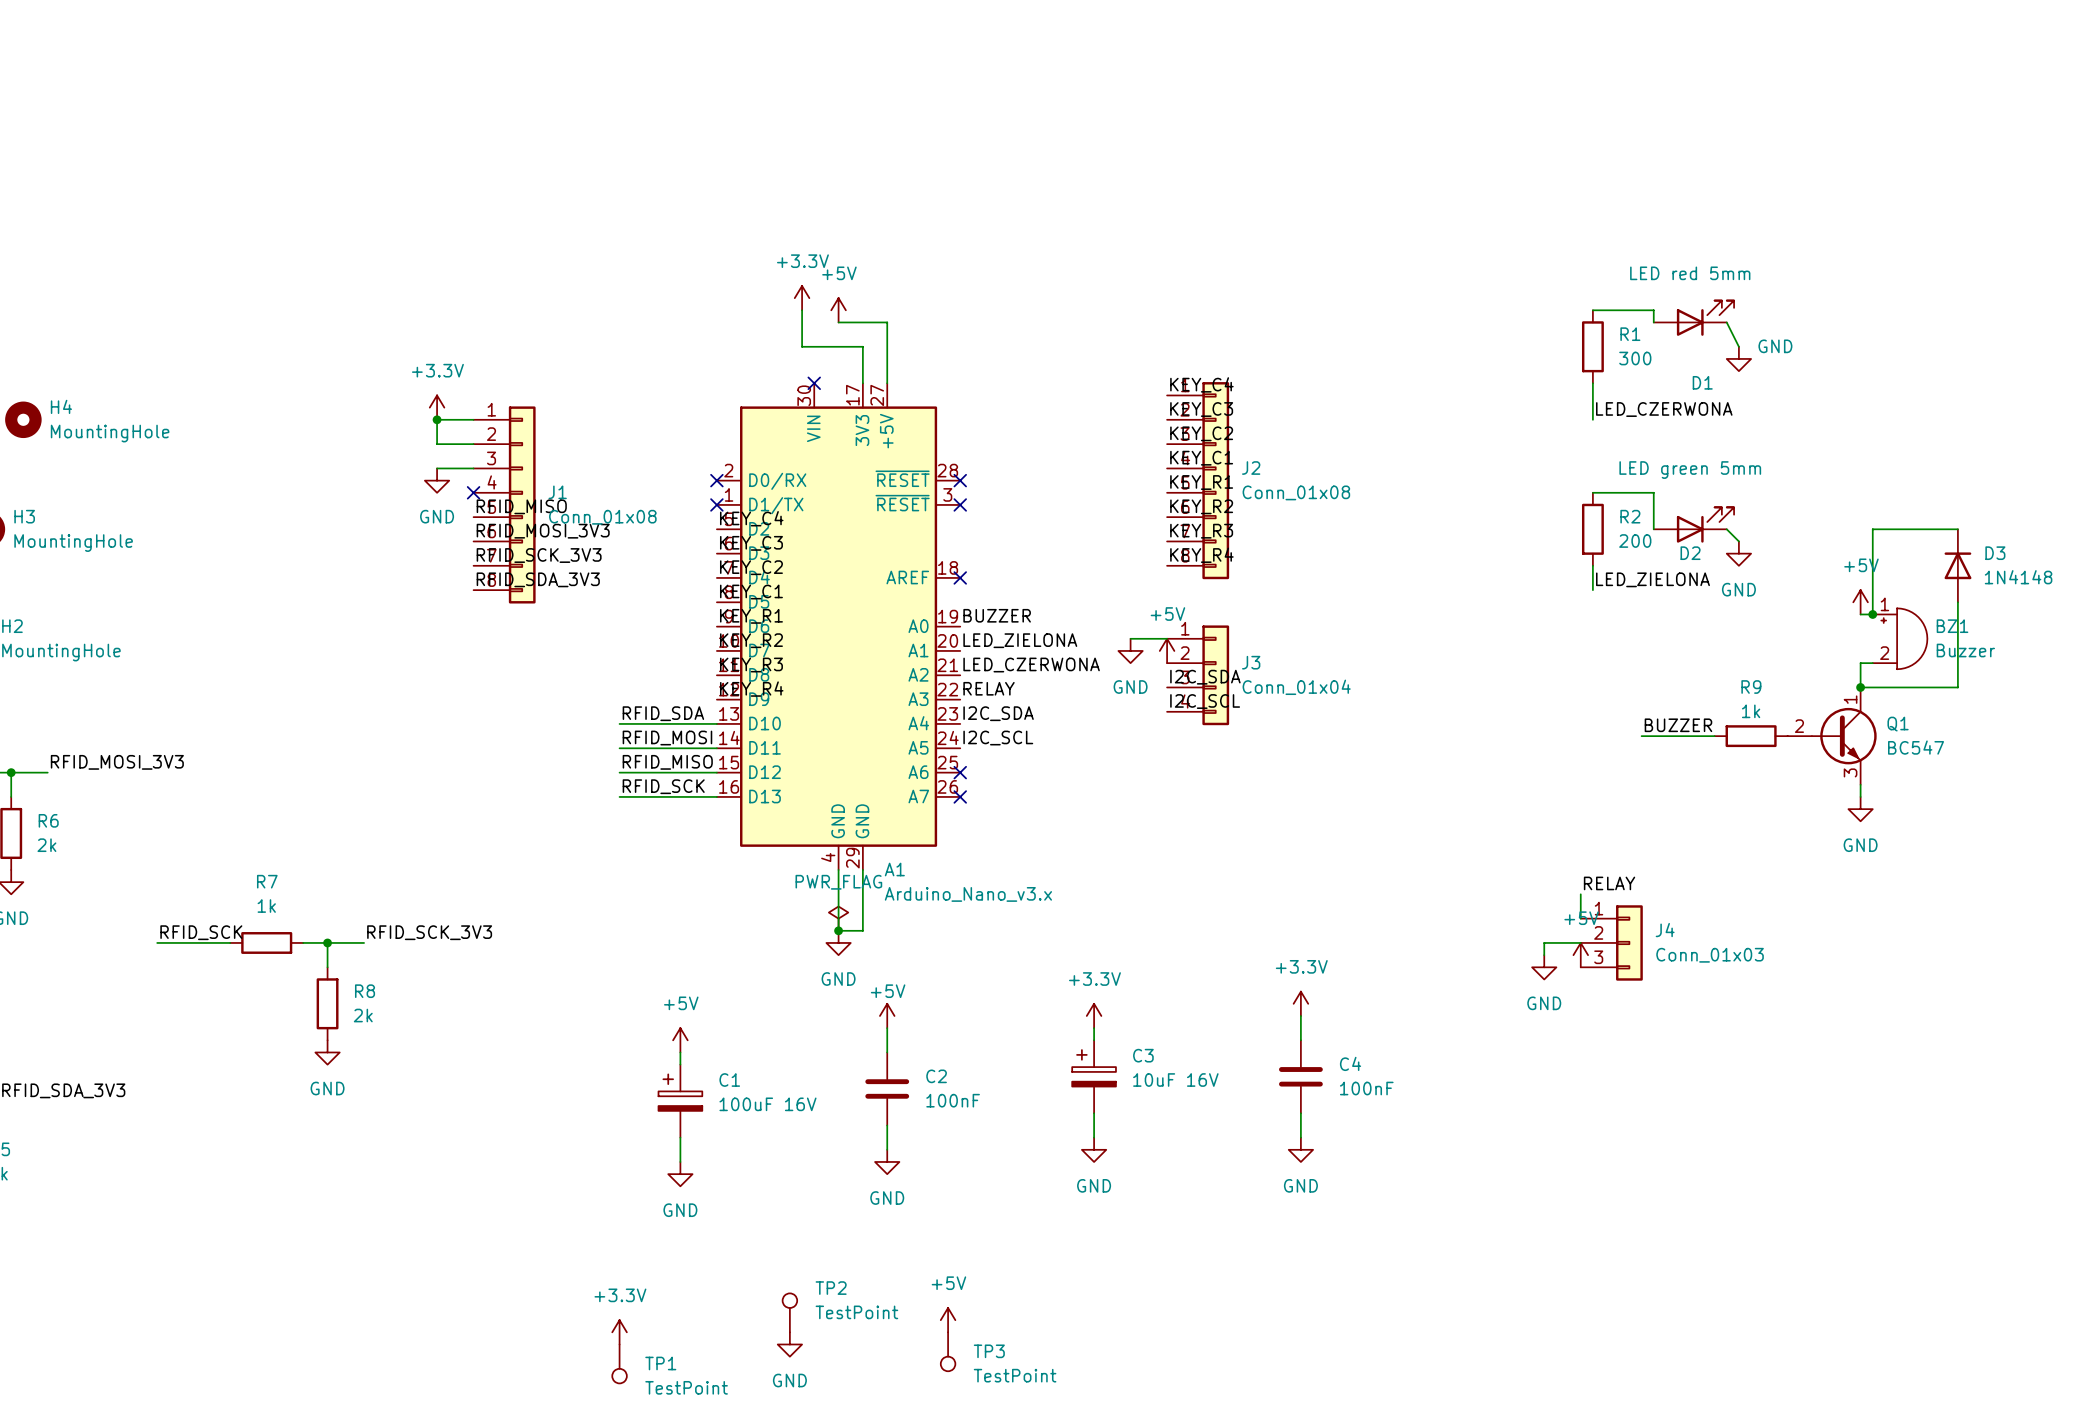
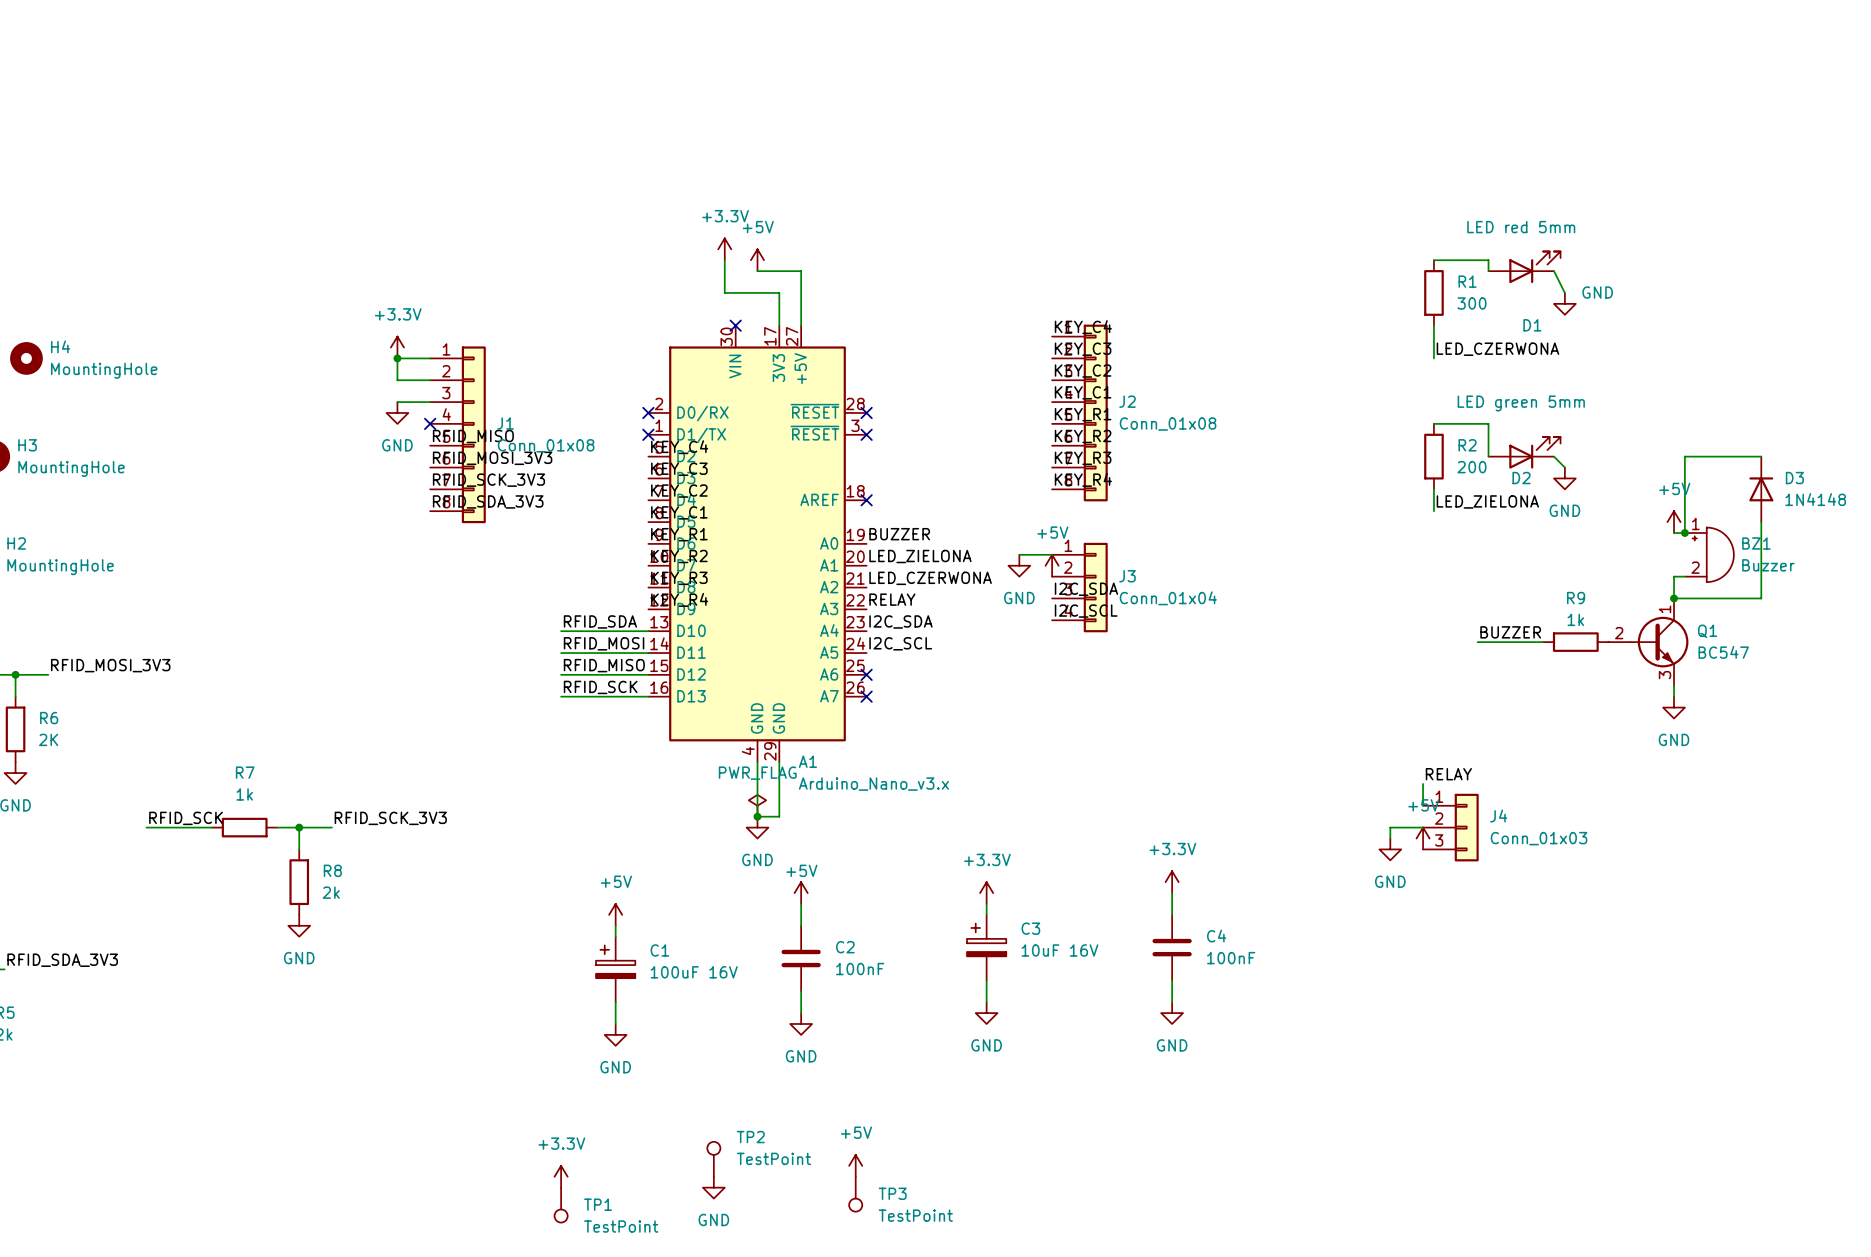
R6 value: 2k (46, 845) -> 2K (48, 739)

